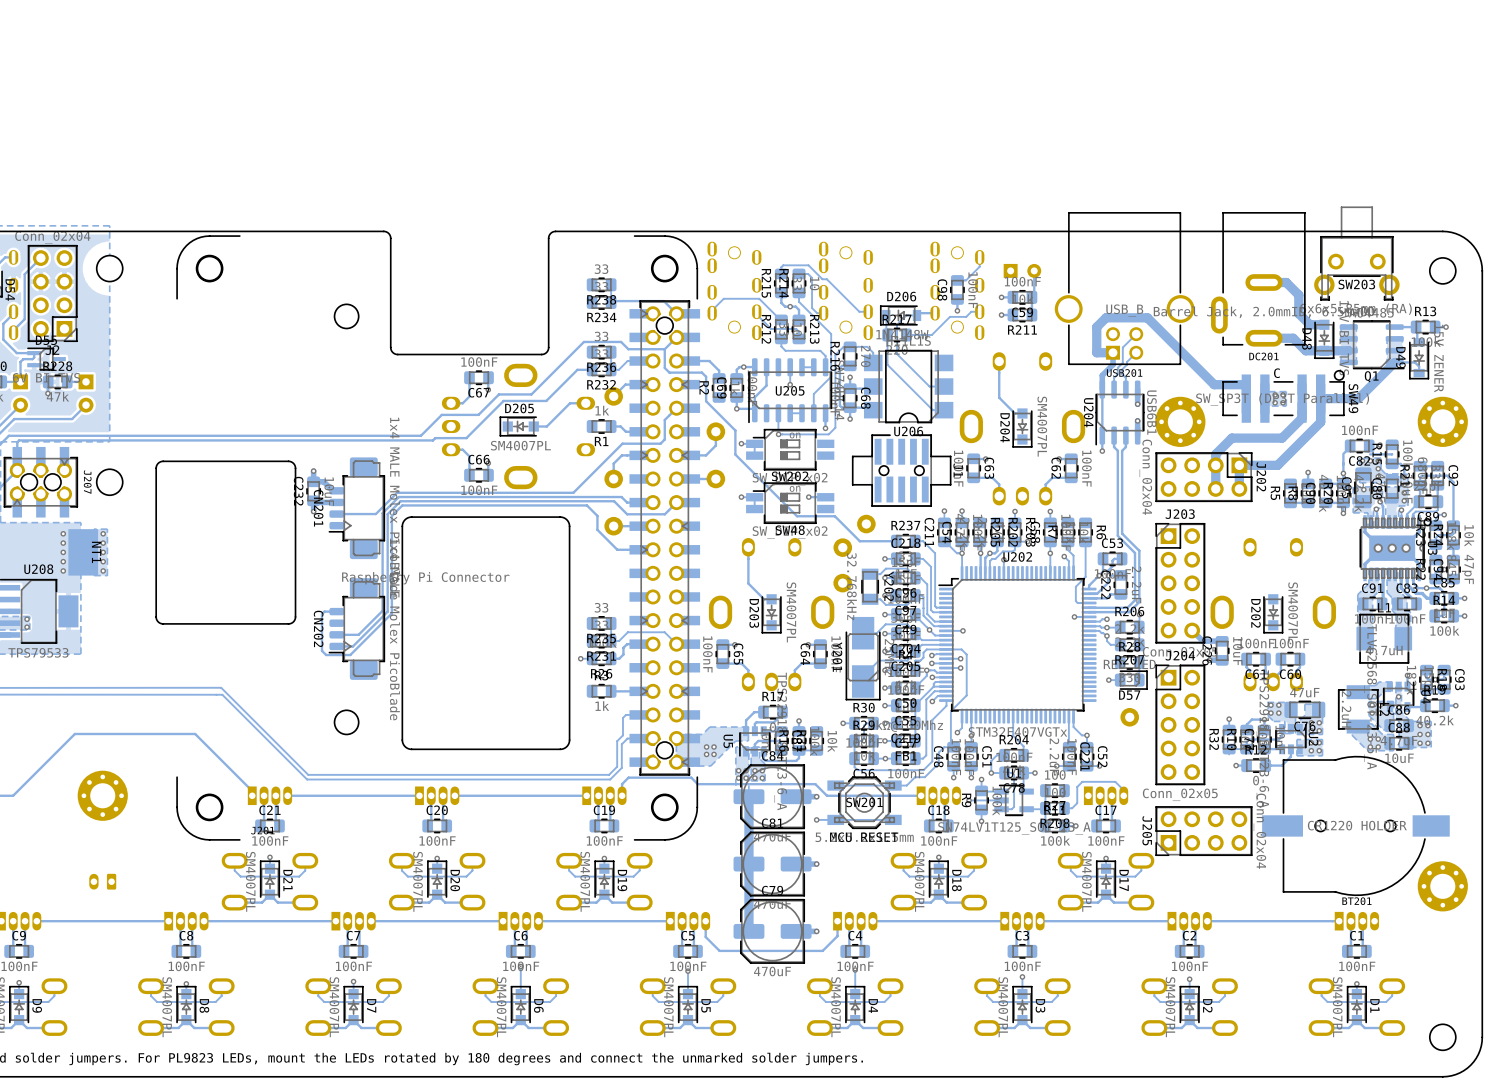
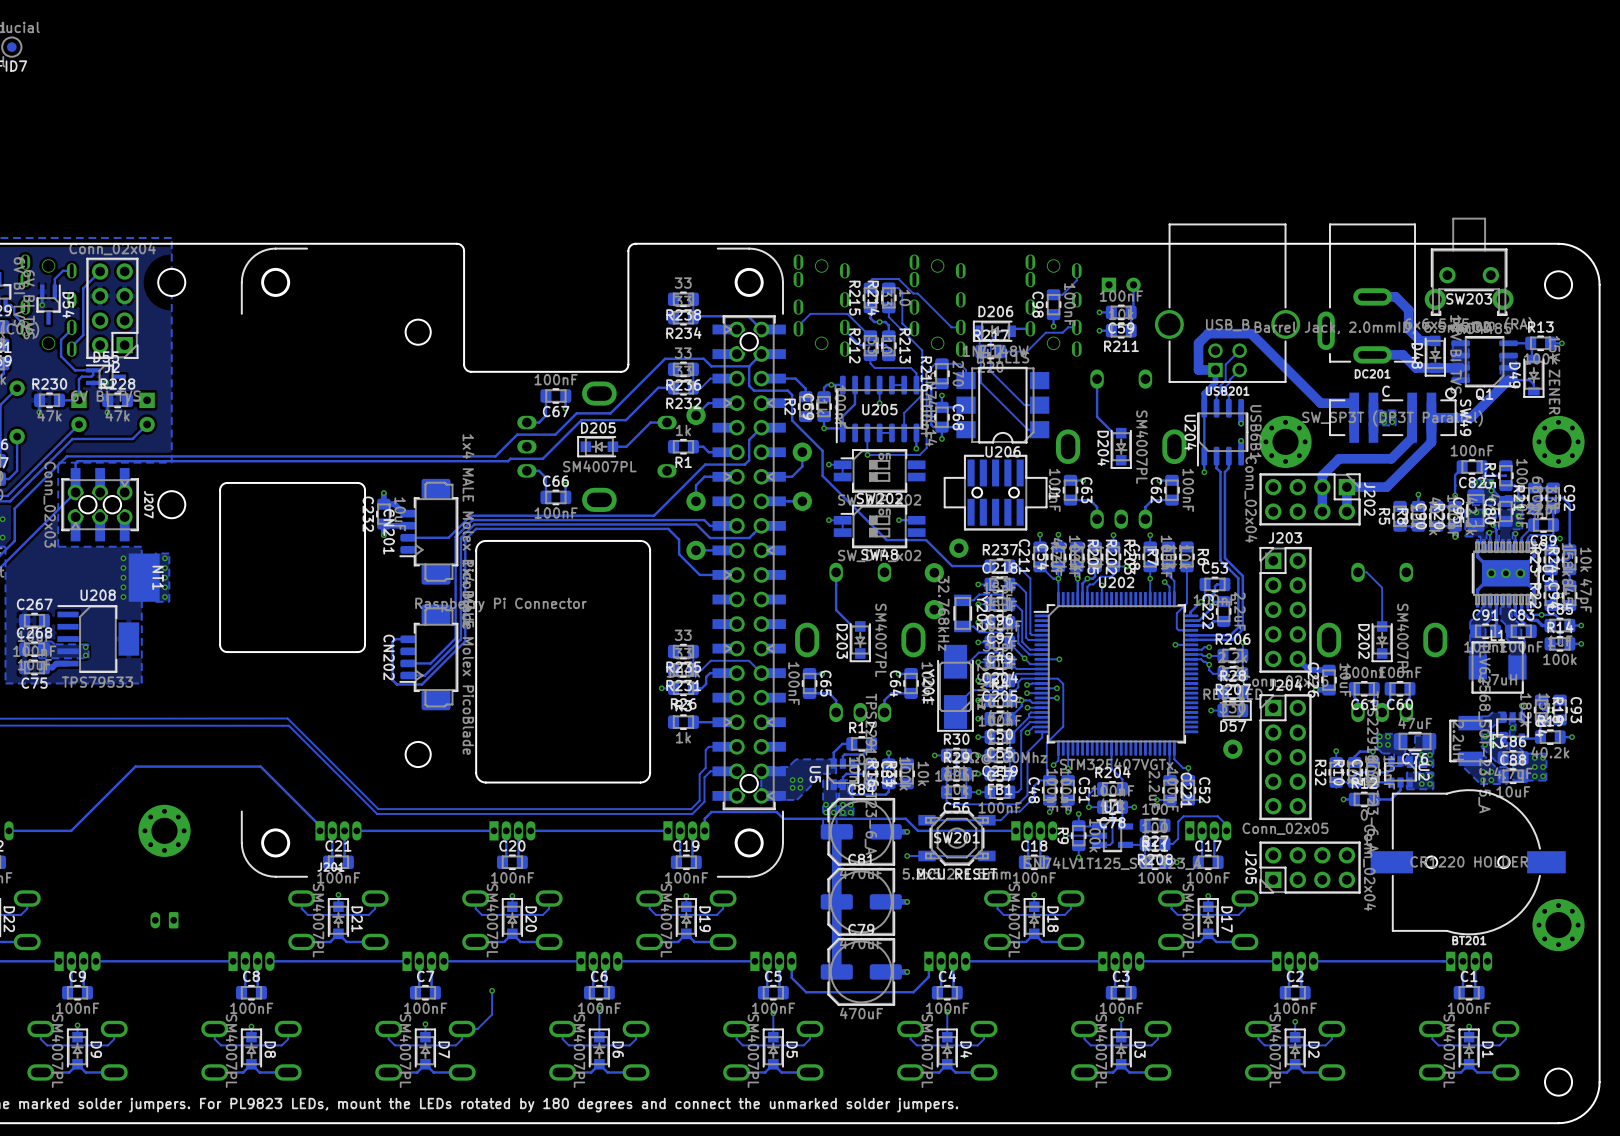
track: none -> (1358, 572) (1366, 572) (1382, 587) (1382, 626)
track: none -> (492, 990) (492, 1014) (477, 1028) (462, 1028)
via: none -> (492, 990)

